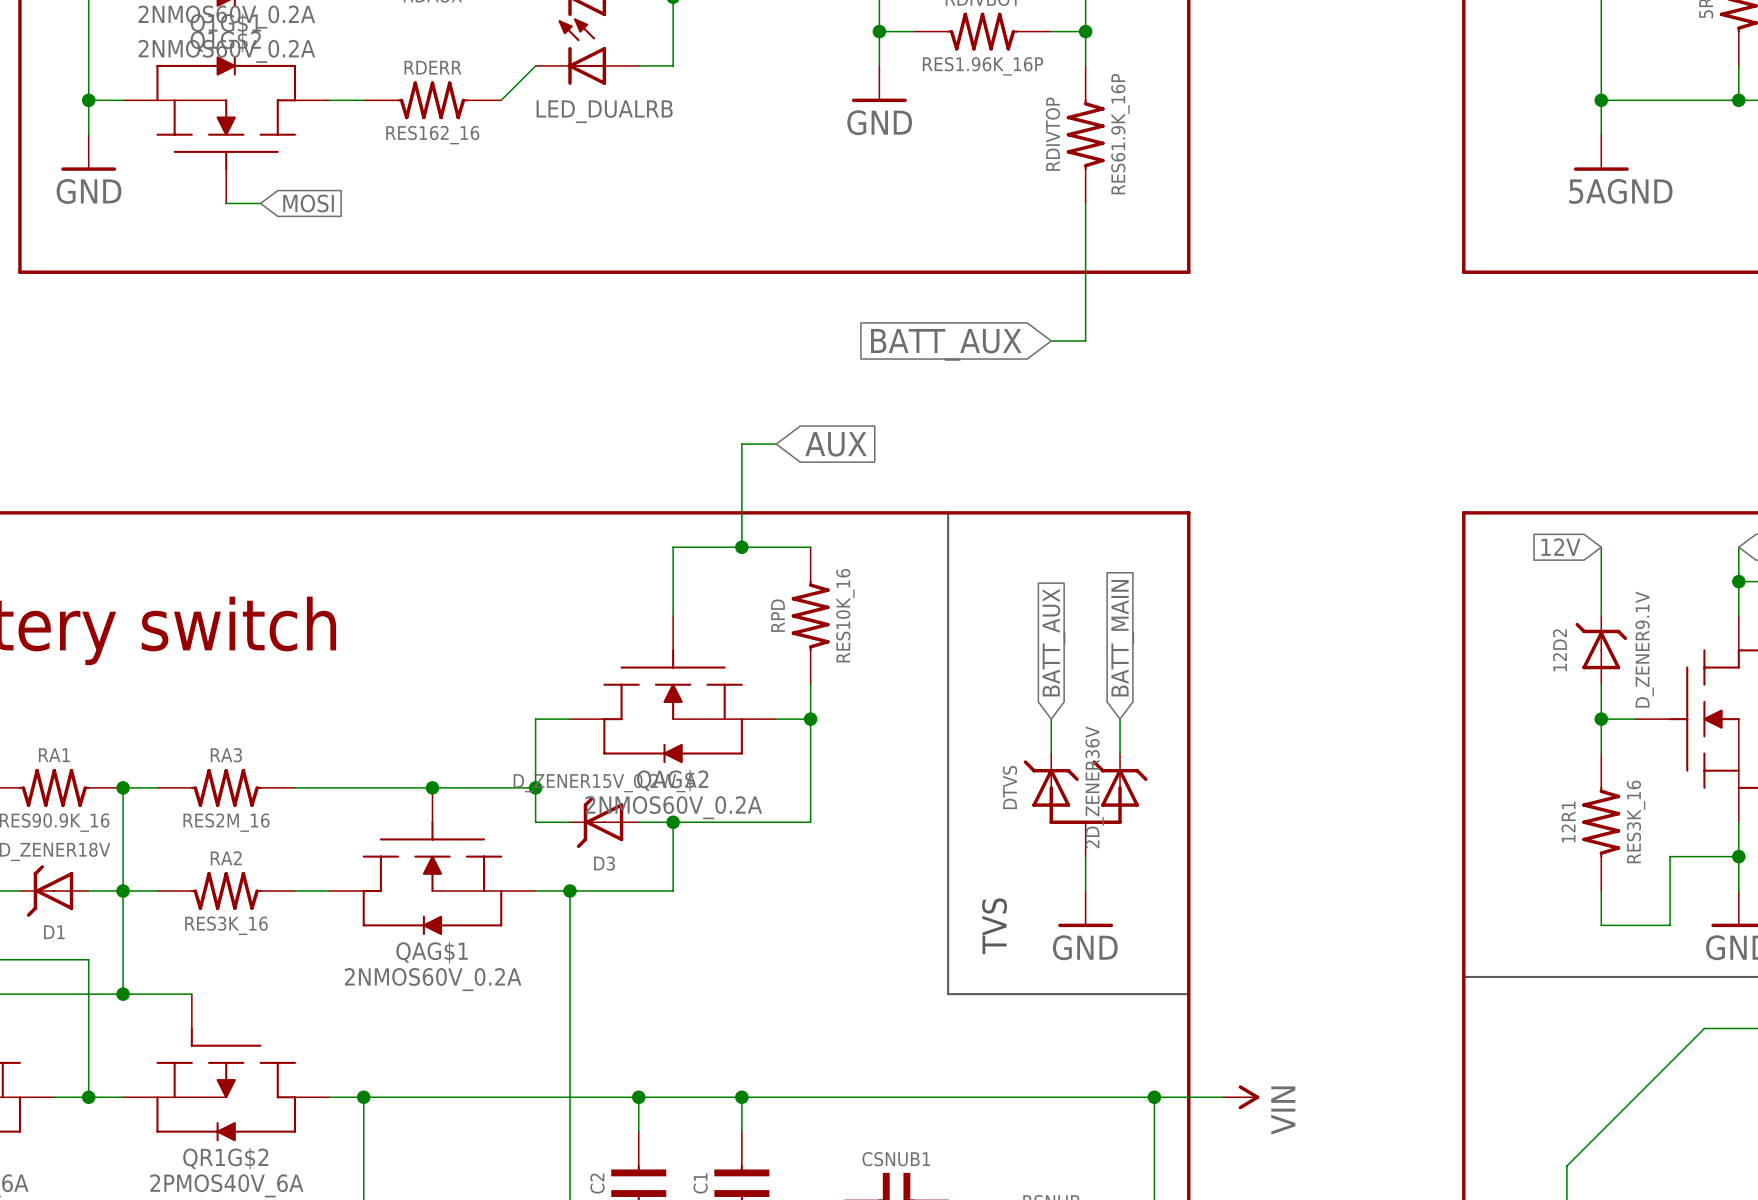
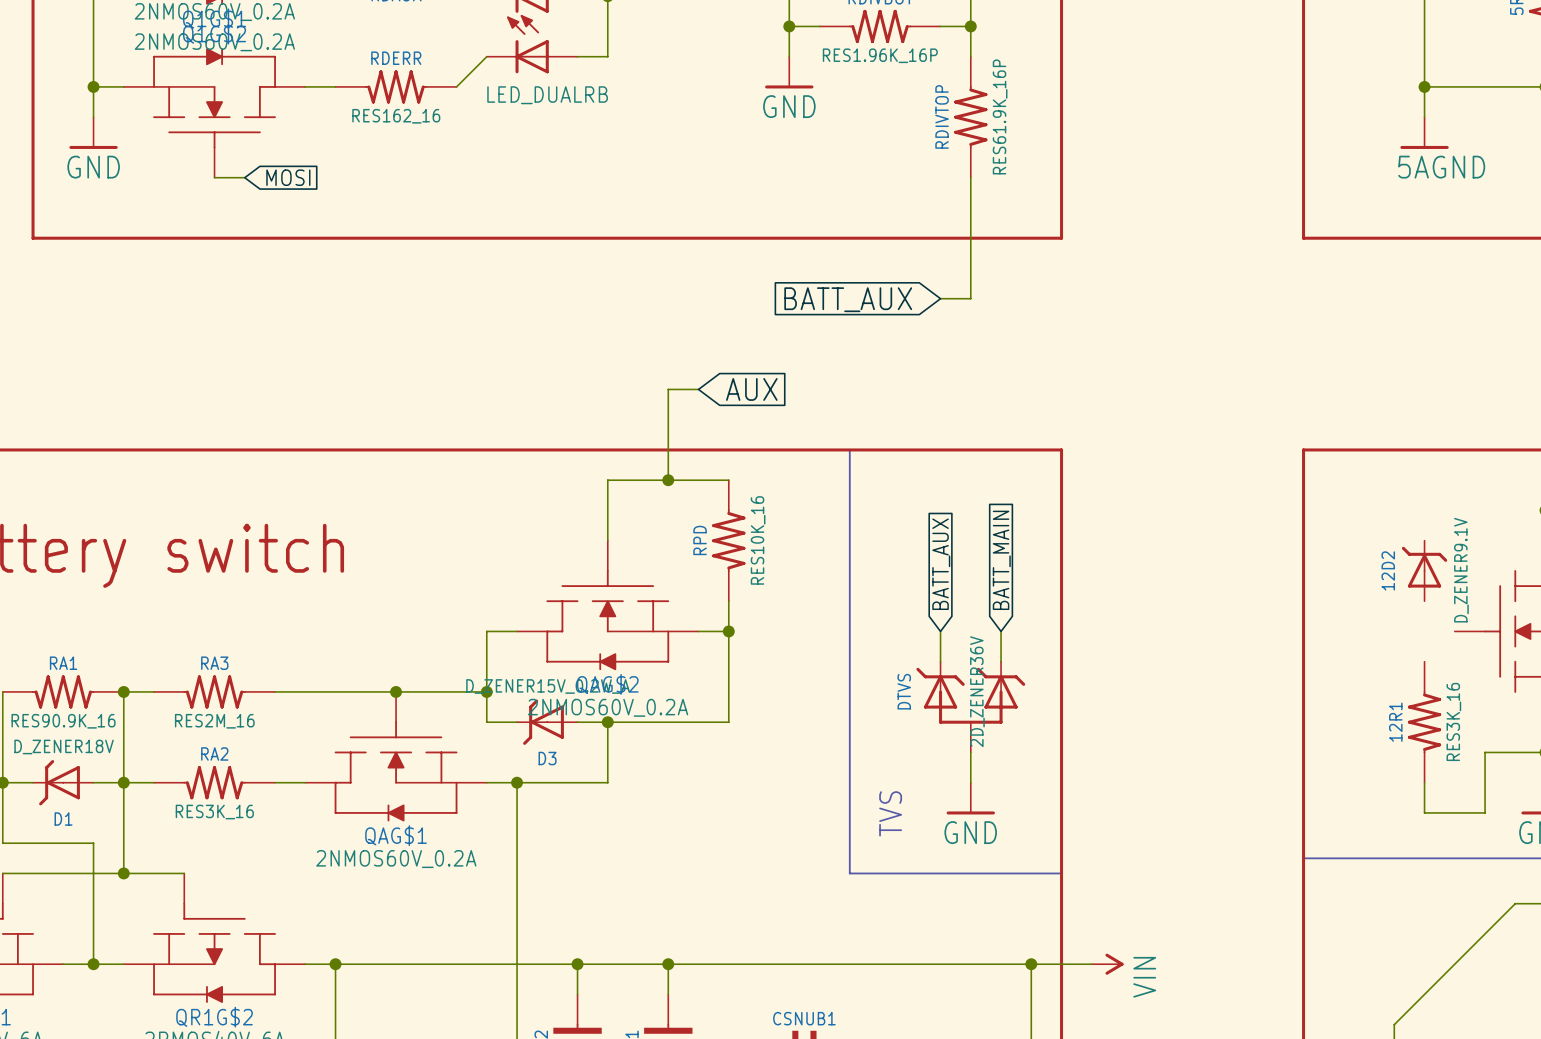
global label: 12V (1560, 547) -> none
wire: (1601, 547) (1601, 615) -> none
wire: (1601, 684) (1601, 753) -> none
wire: (1601, 719) (1635, 719) -> none
junction: (1601, 719) -> none

